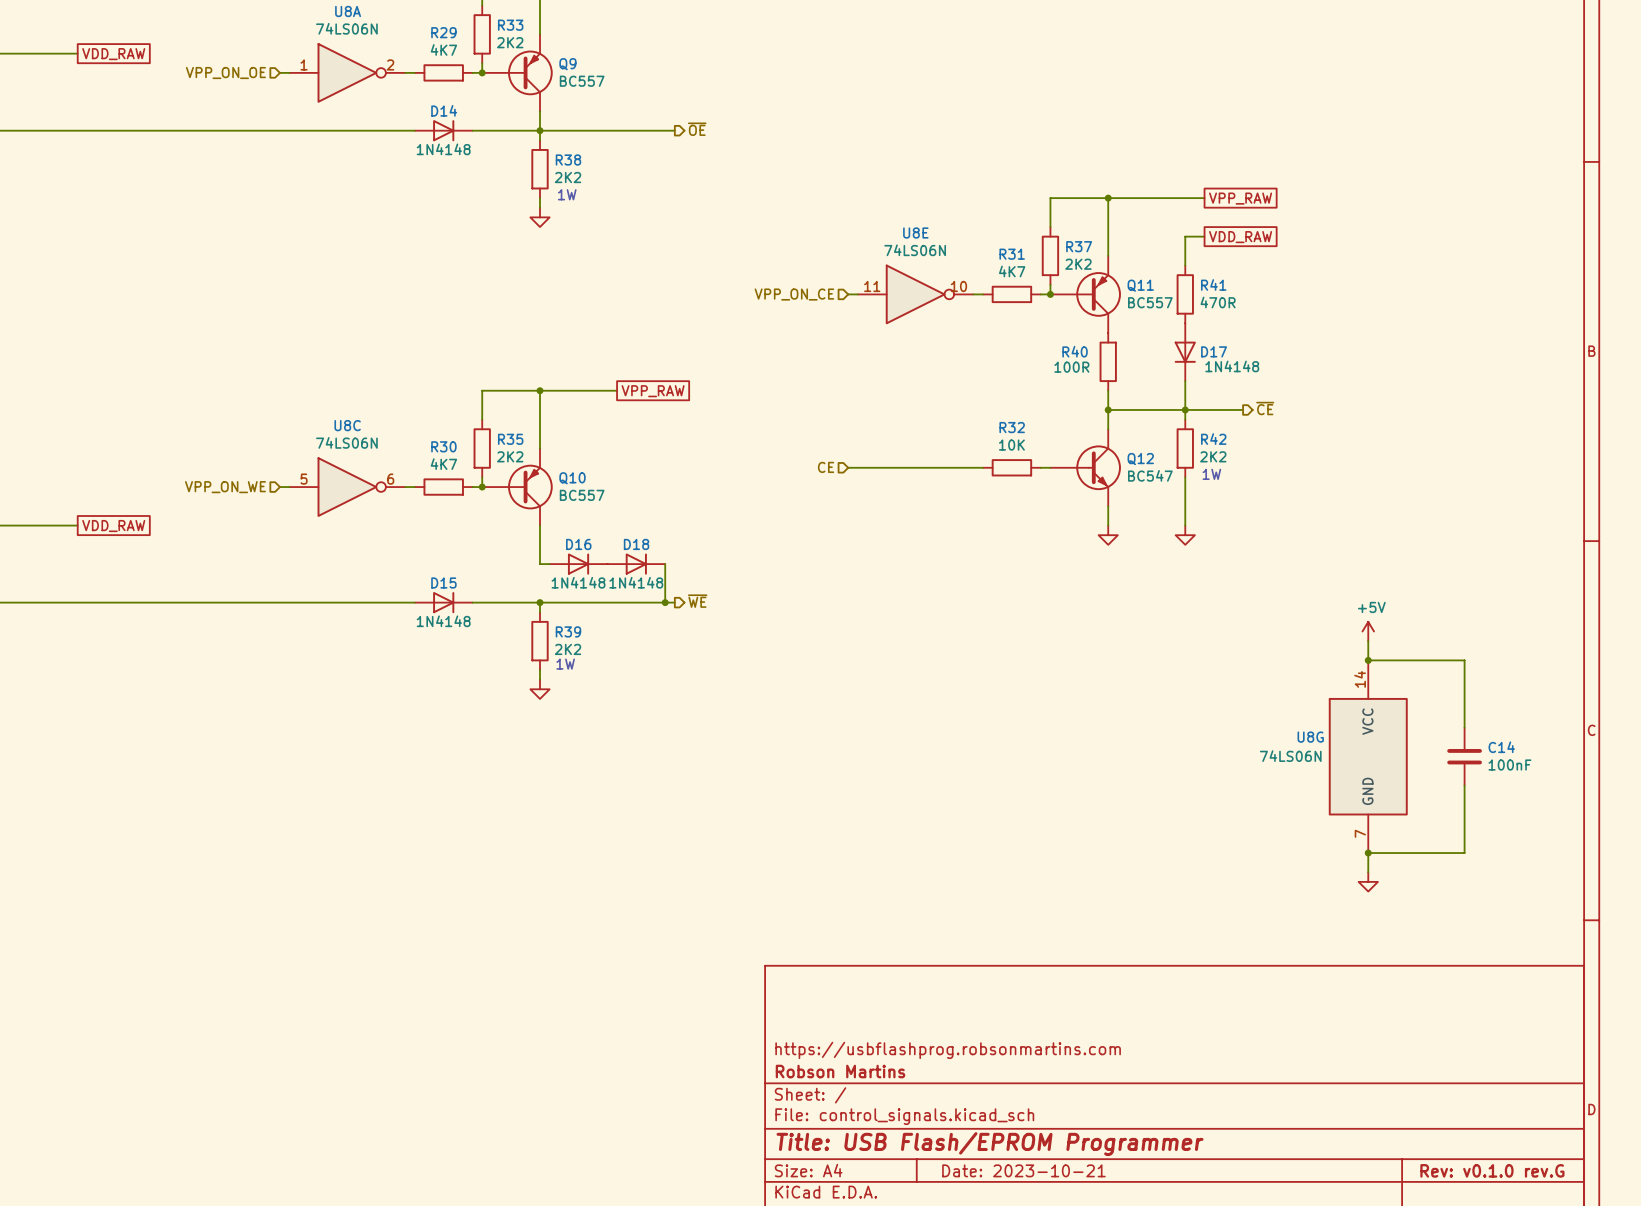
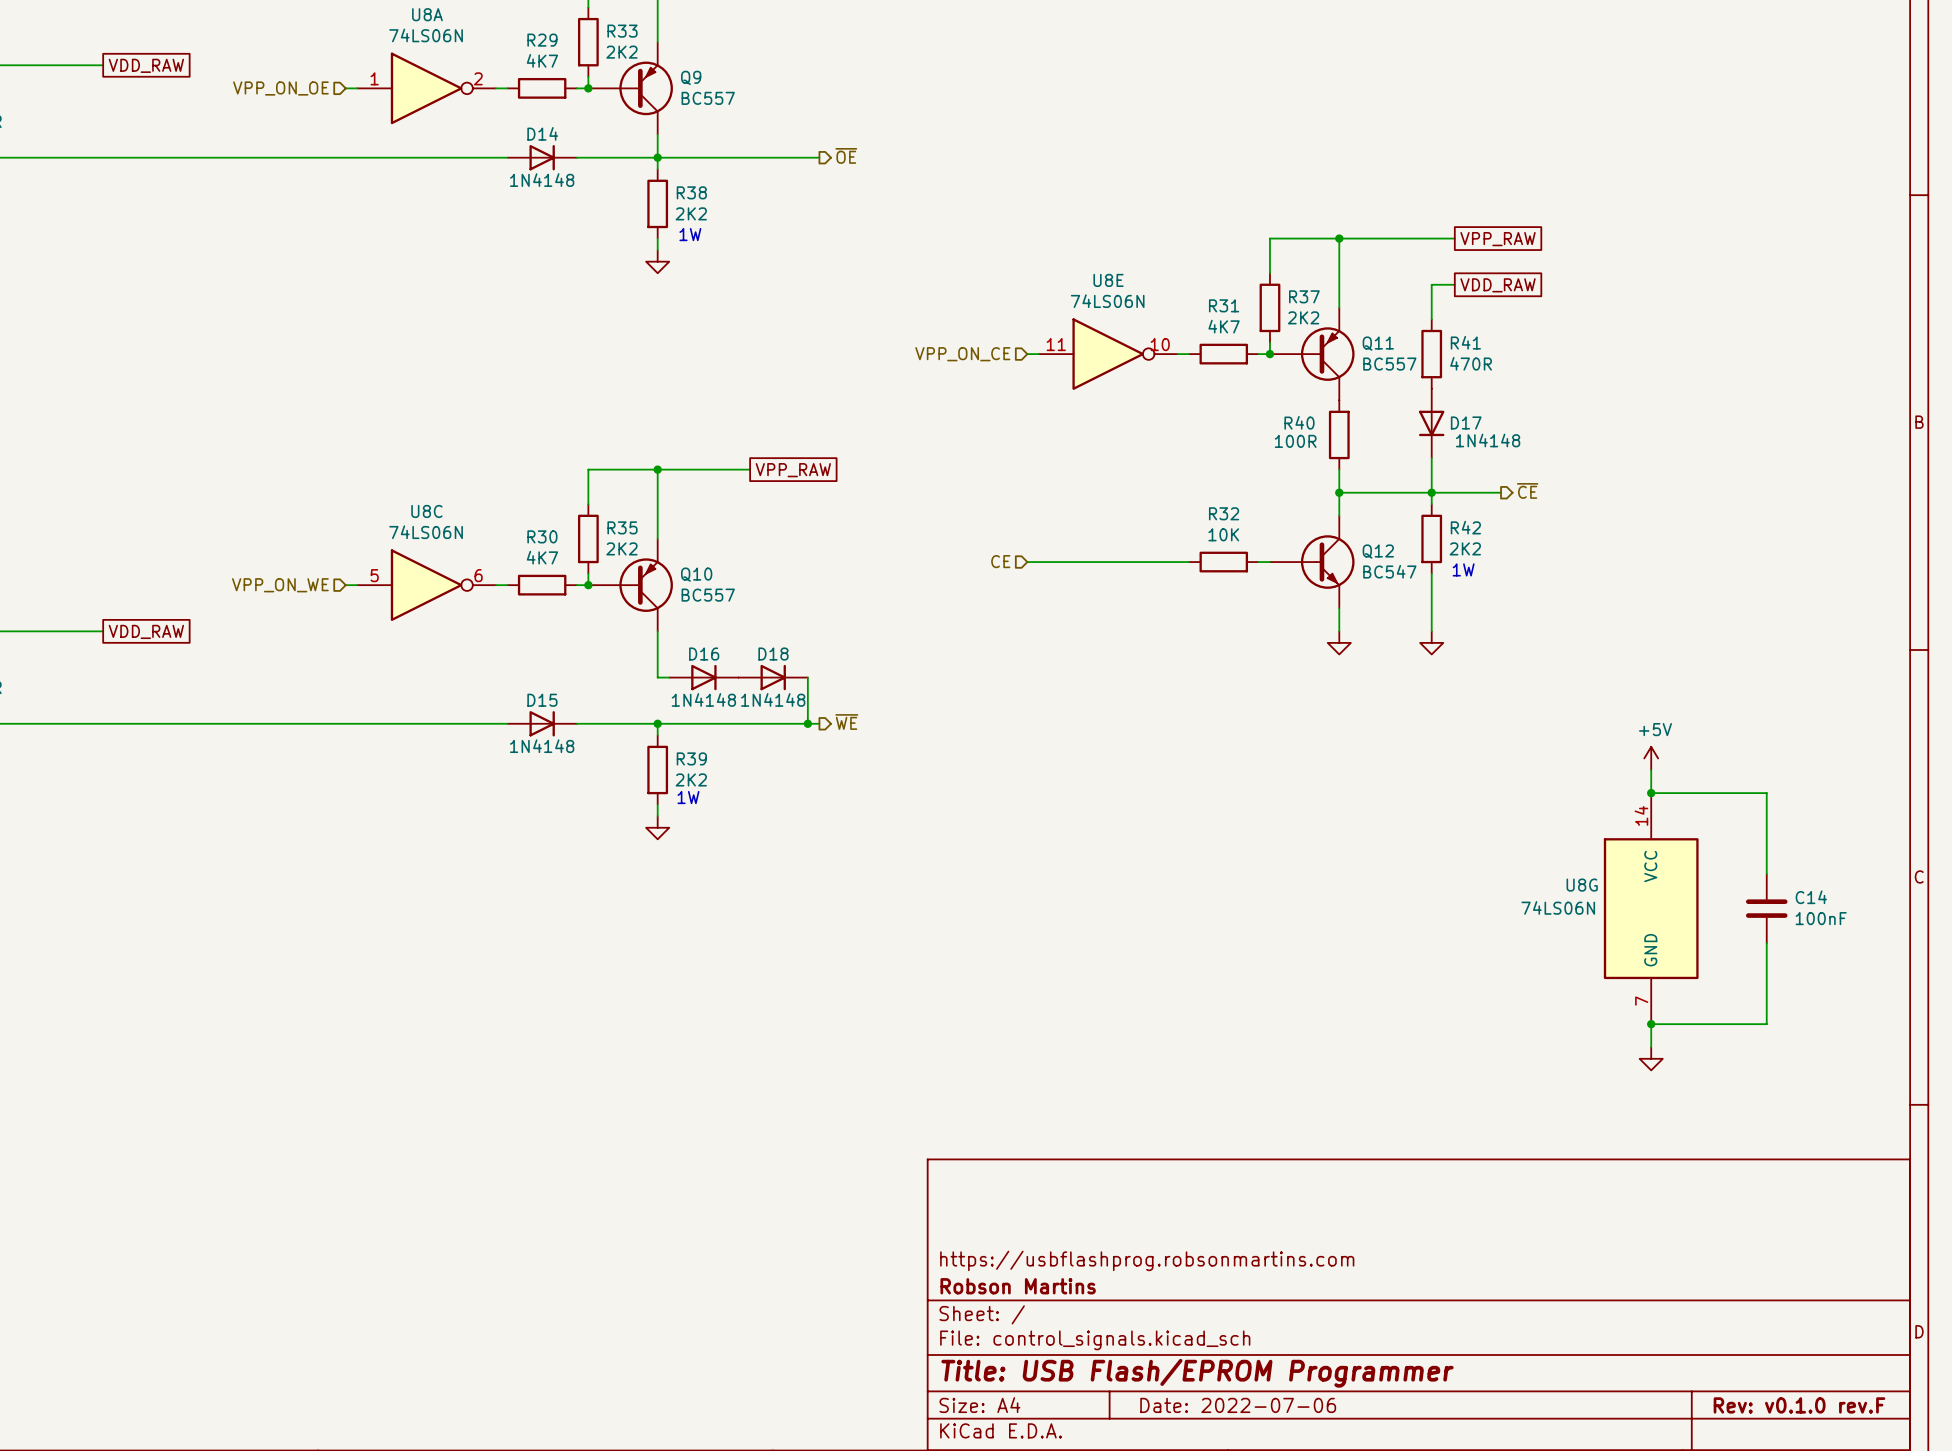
title block: Date: 2023-10-21 (1023, 1170) -> Date: 2022-07-06 (1238, 1405)
title block: Rev: v0.1.0 rev.G (1492, 1170) -> Rev: v0.1.0 rev.F (1799, 1405)

